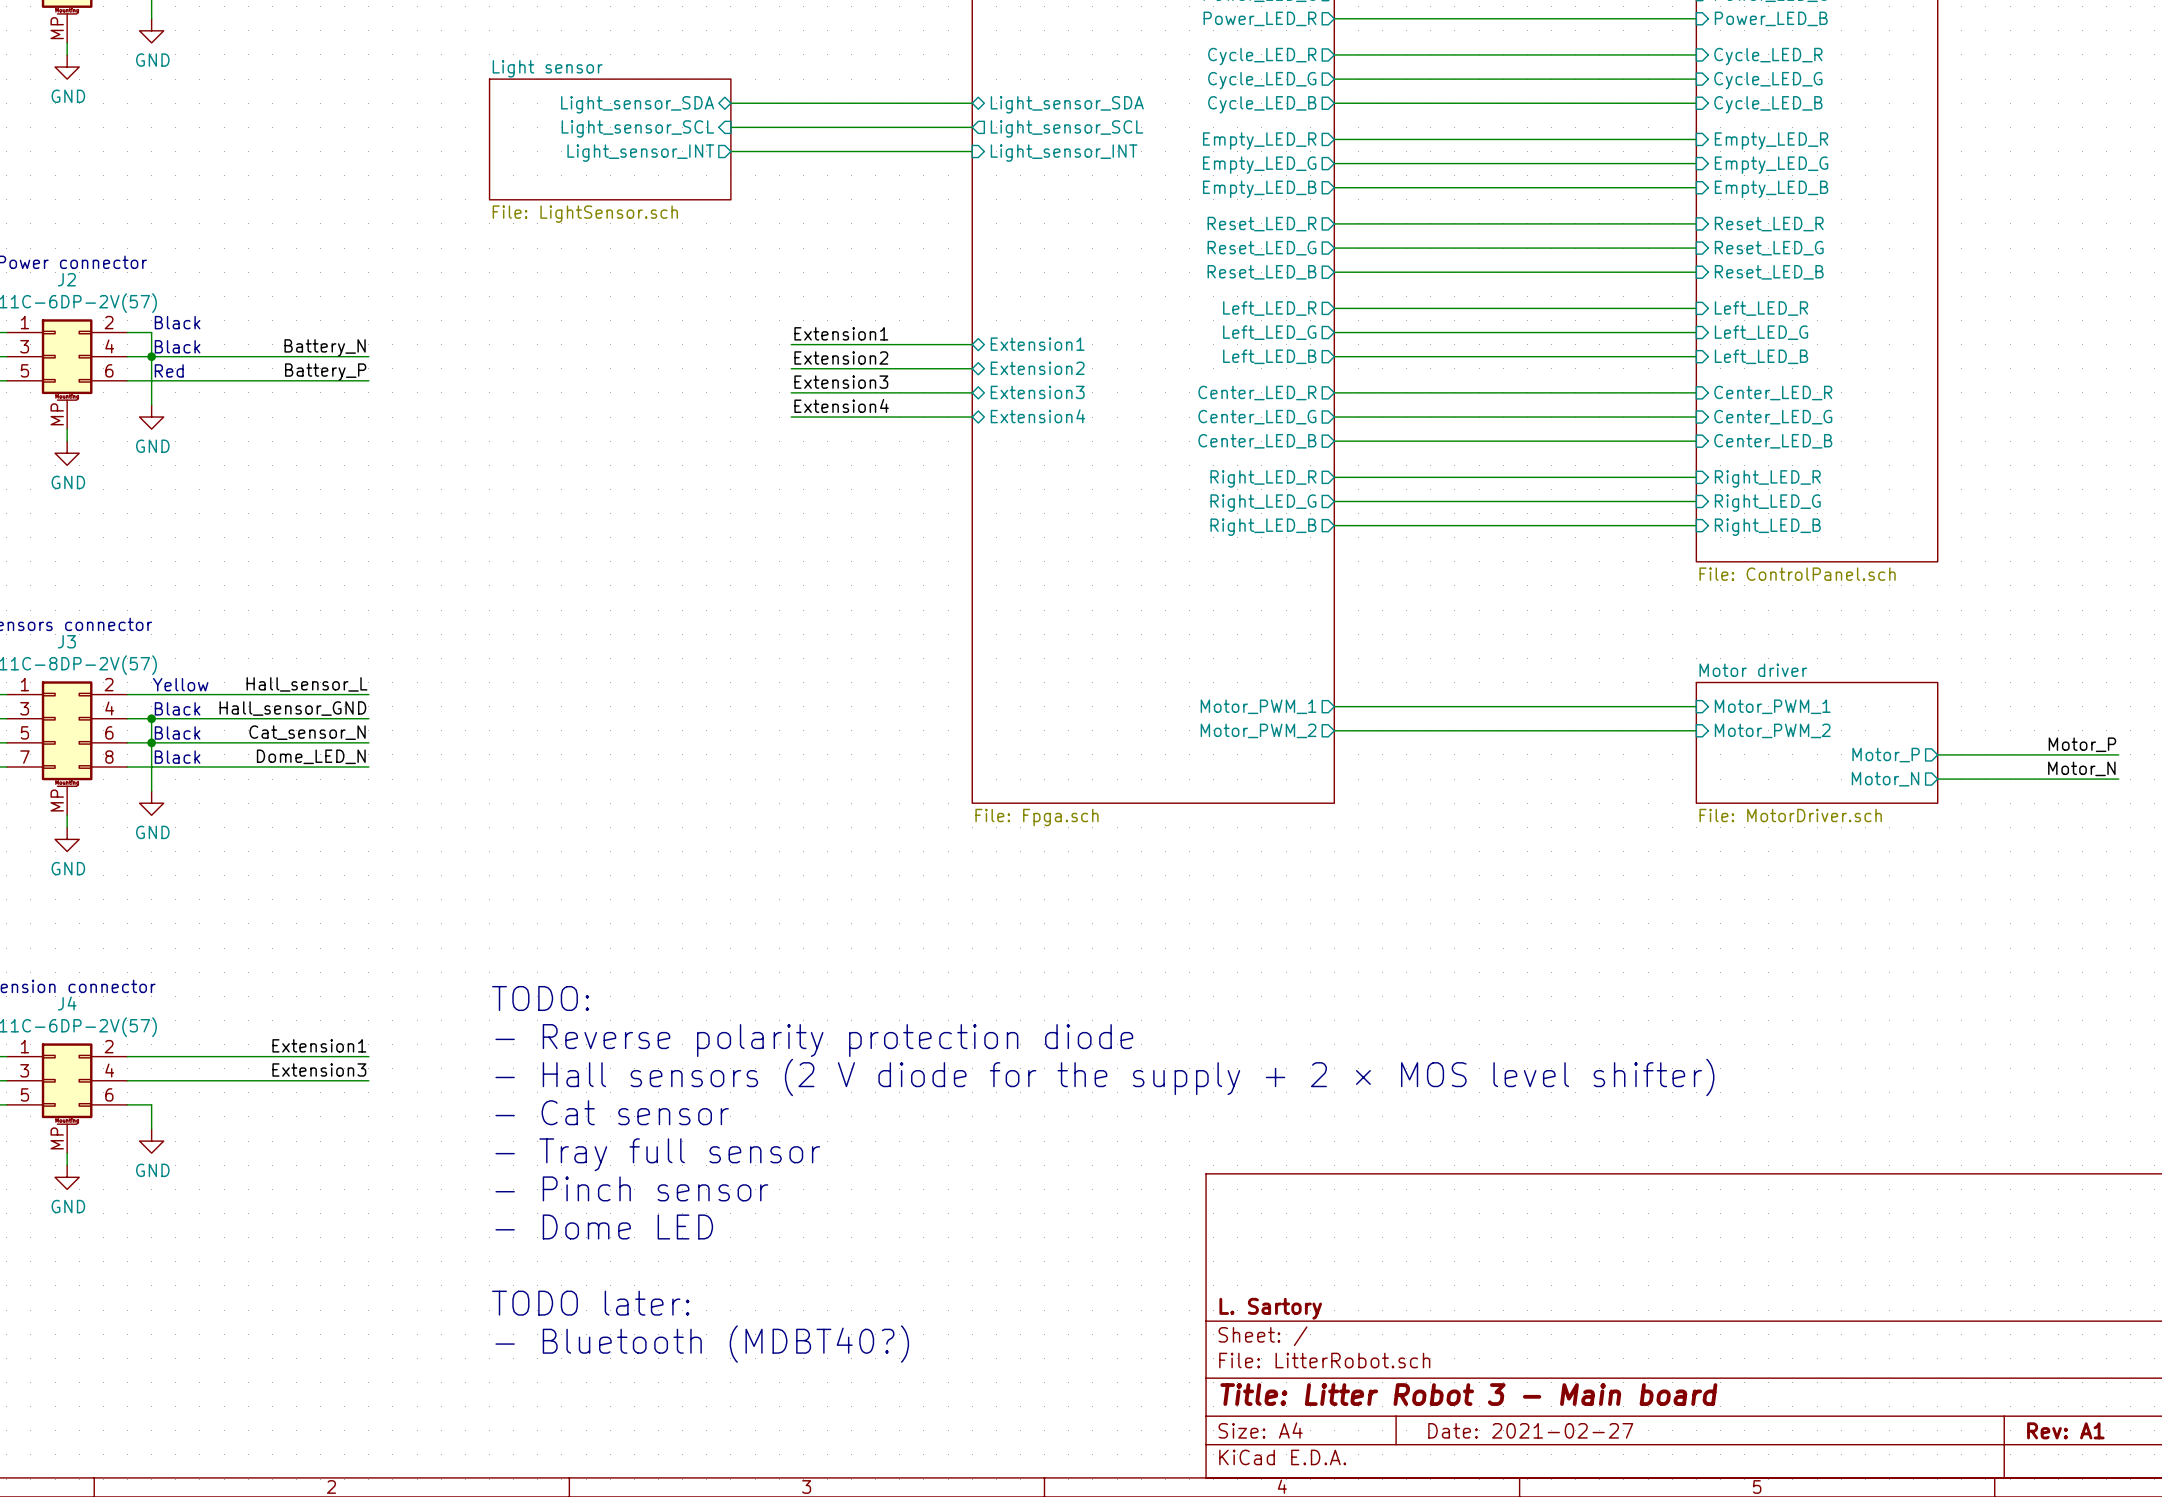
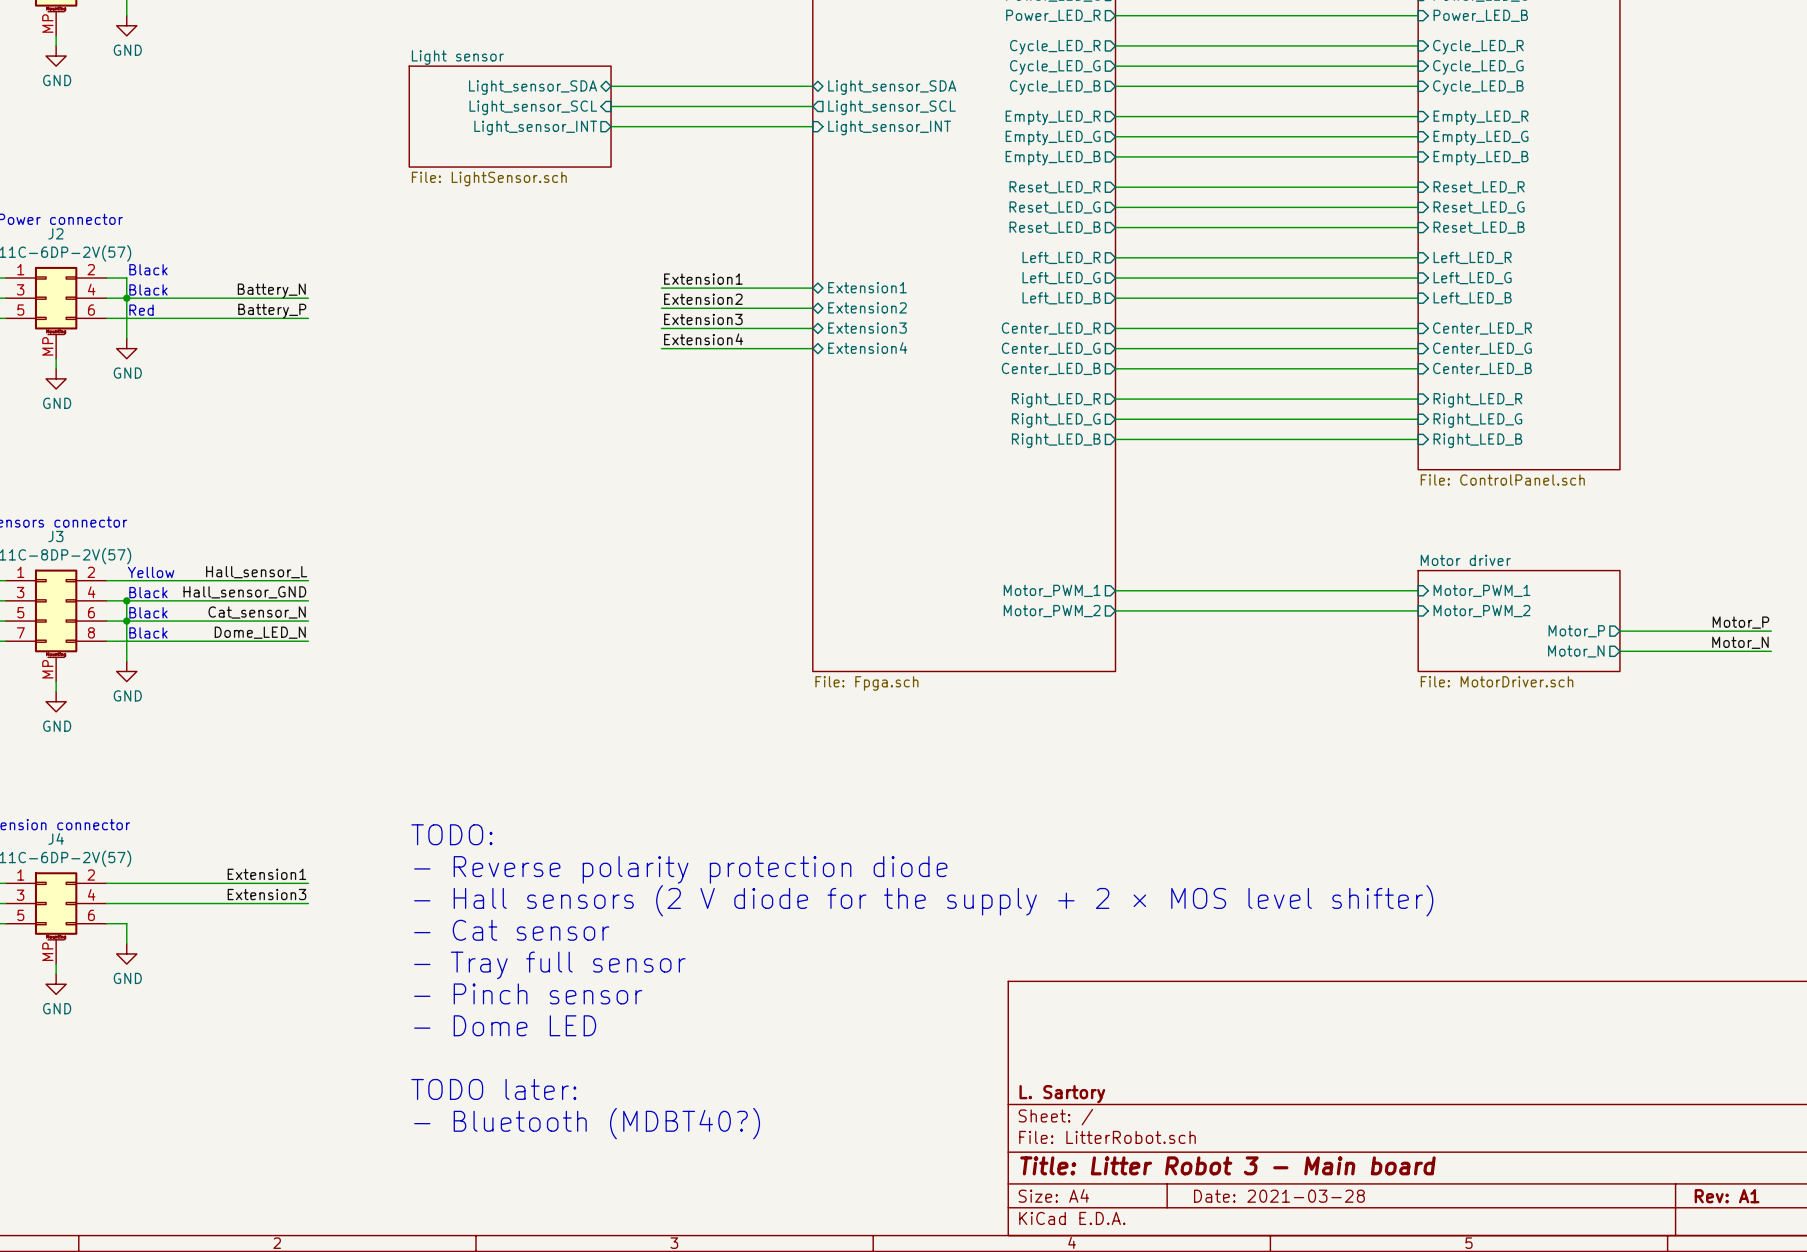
title block: Date: 2021-02-27 (1530, 1430) -> Date: 2021-03-28 (1279, 1196)

